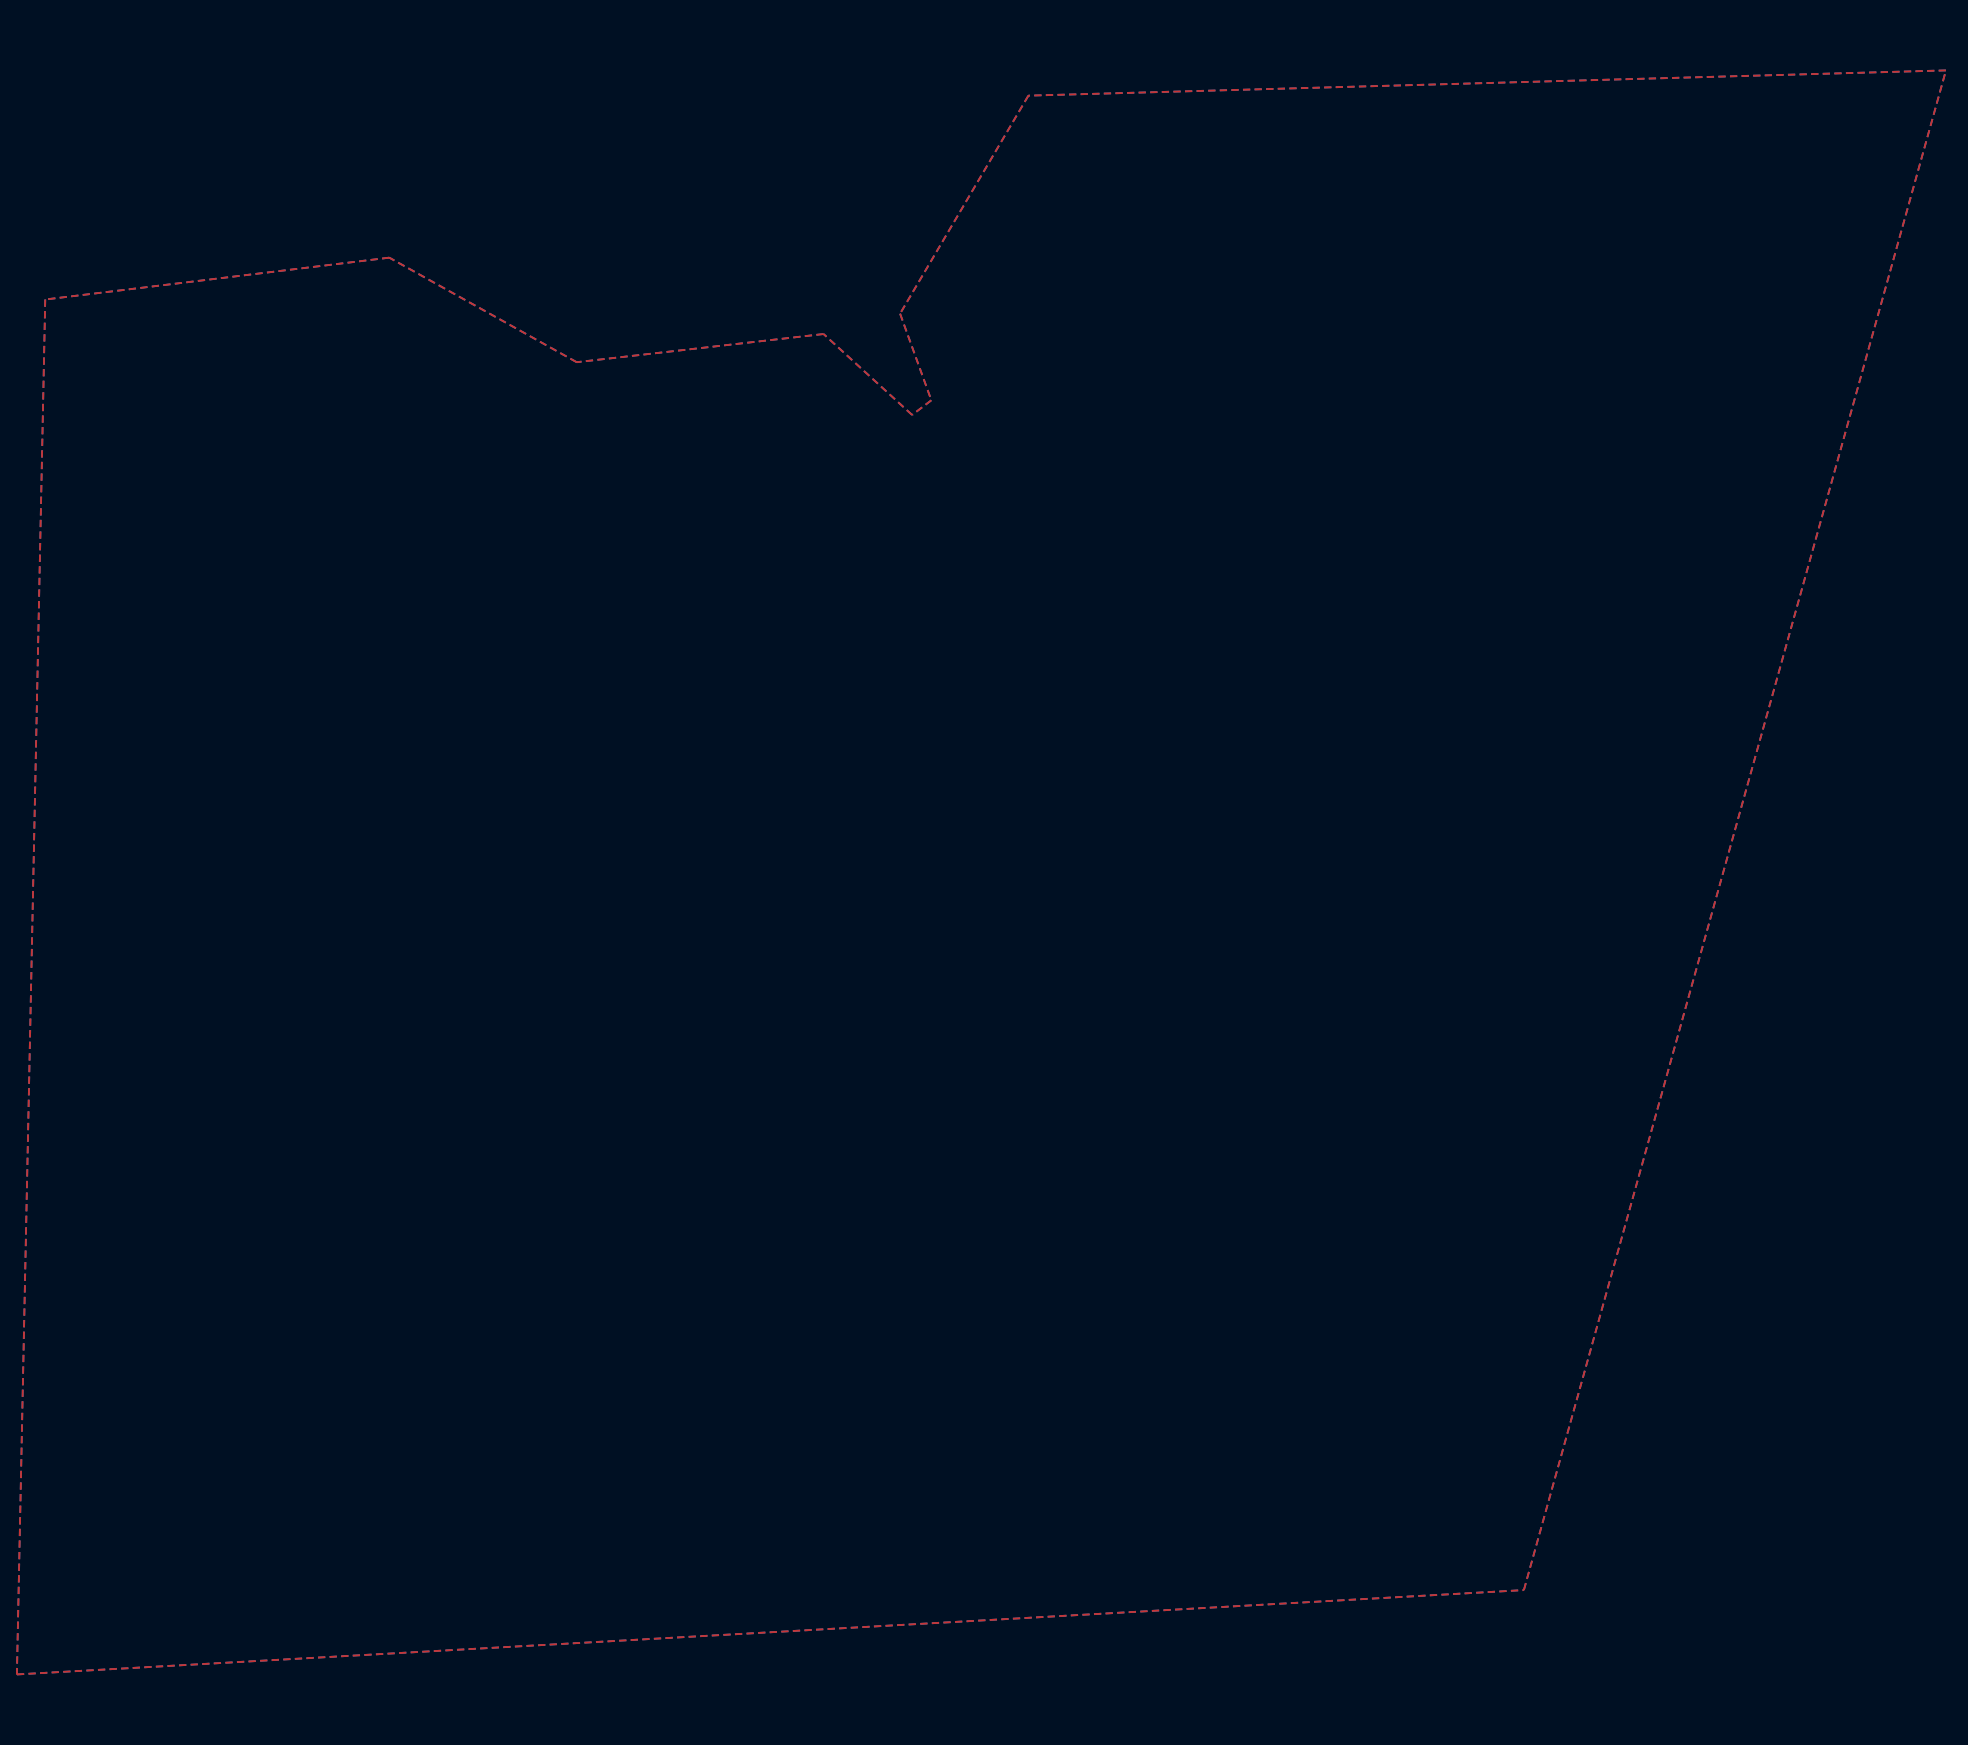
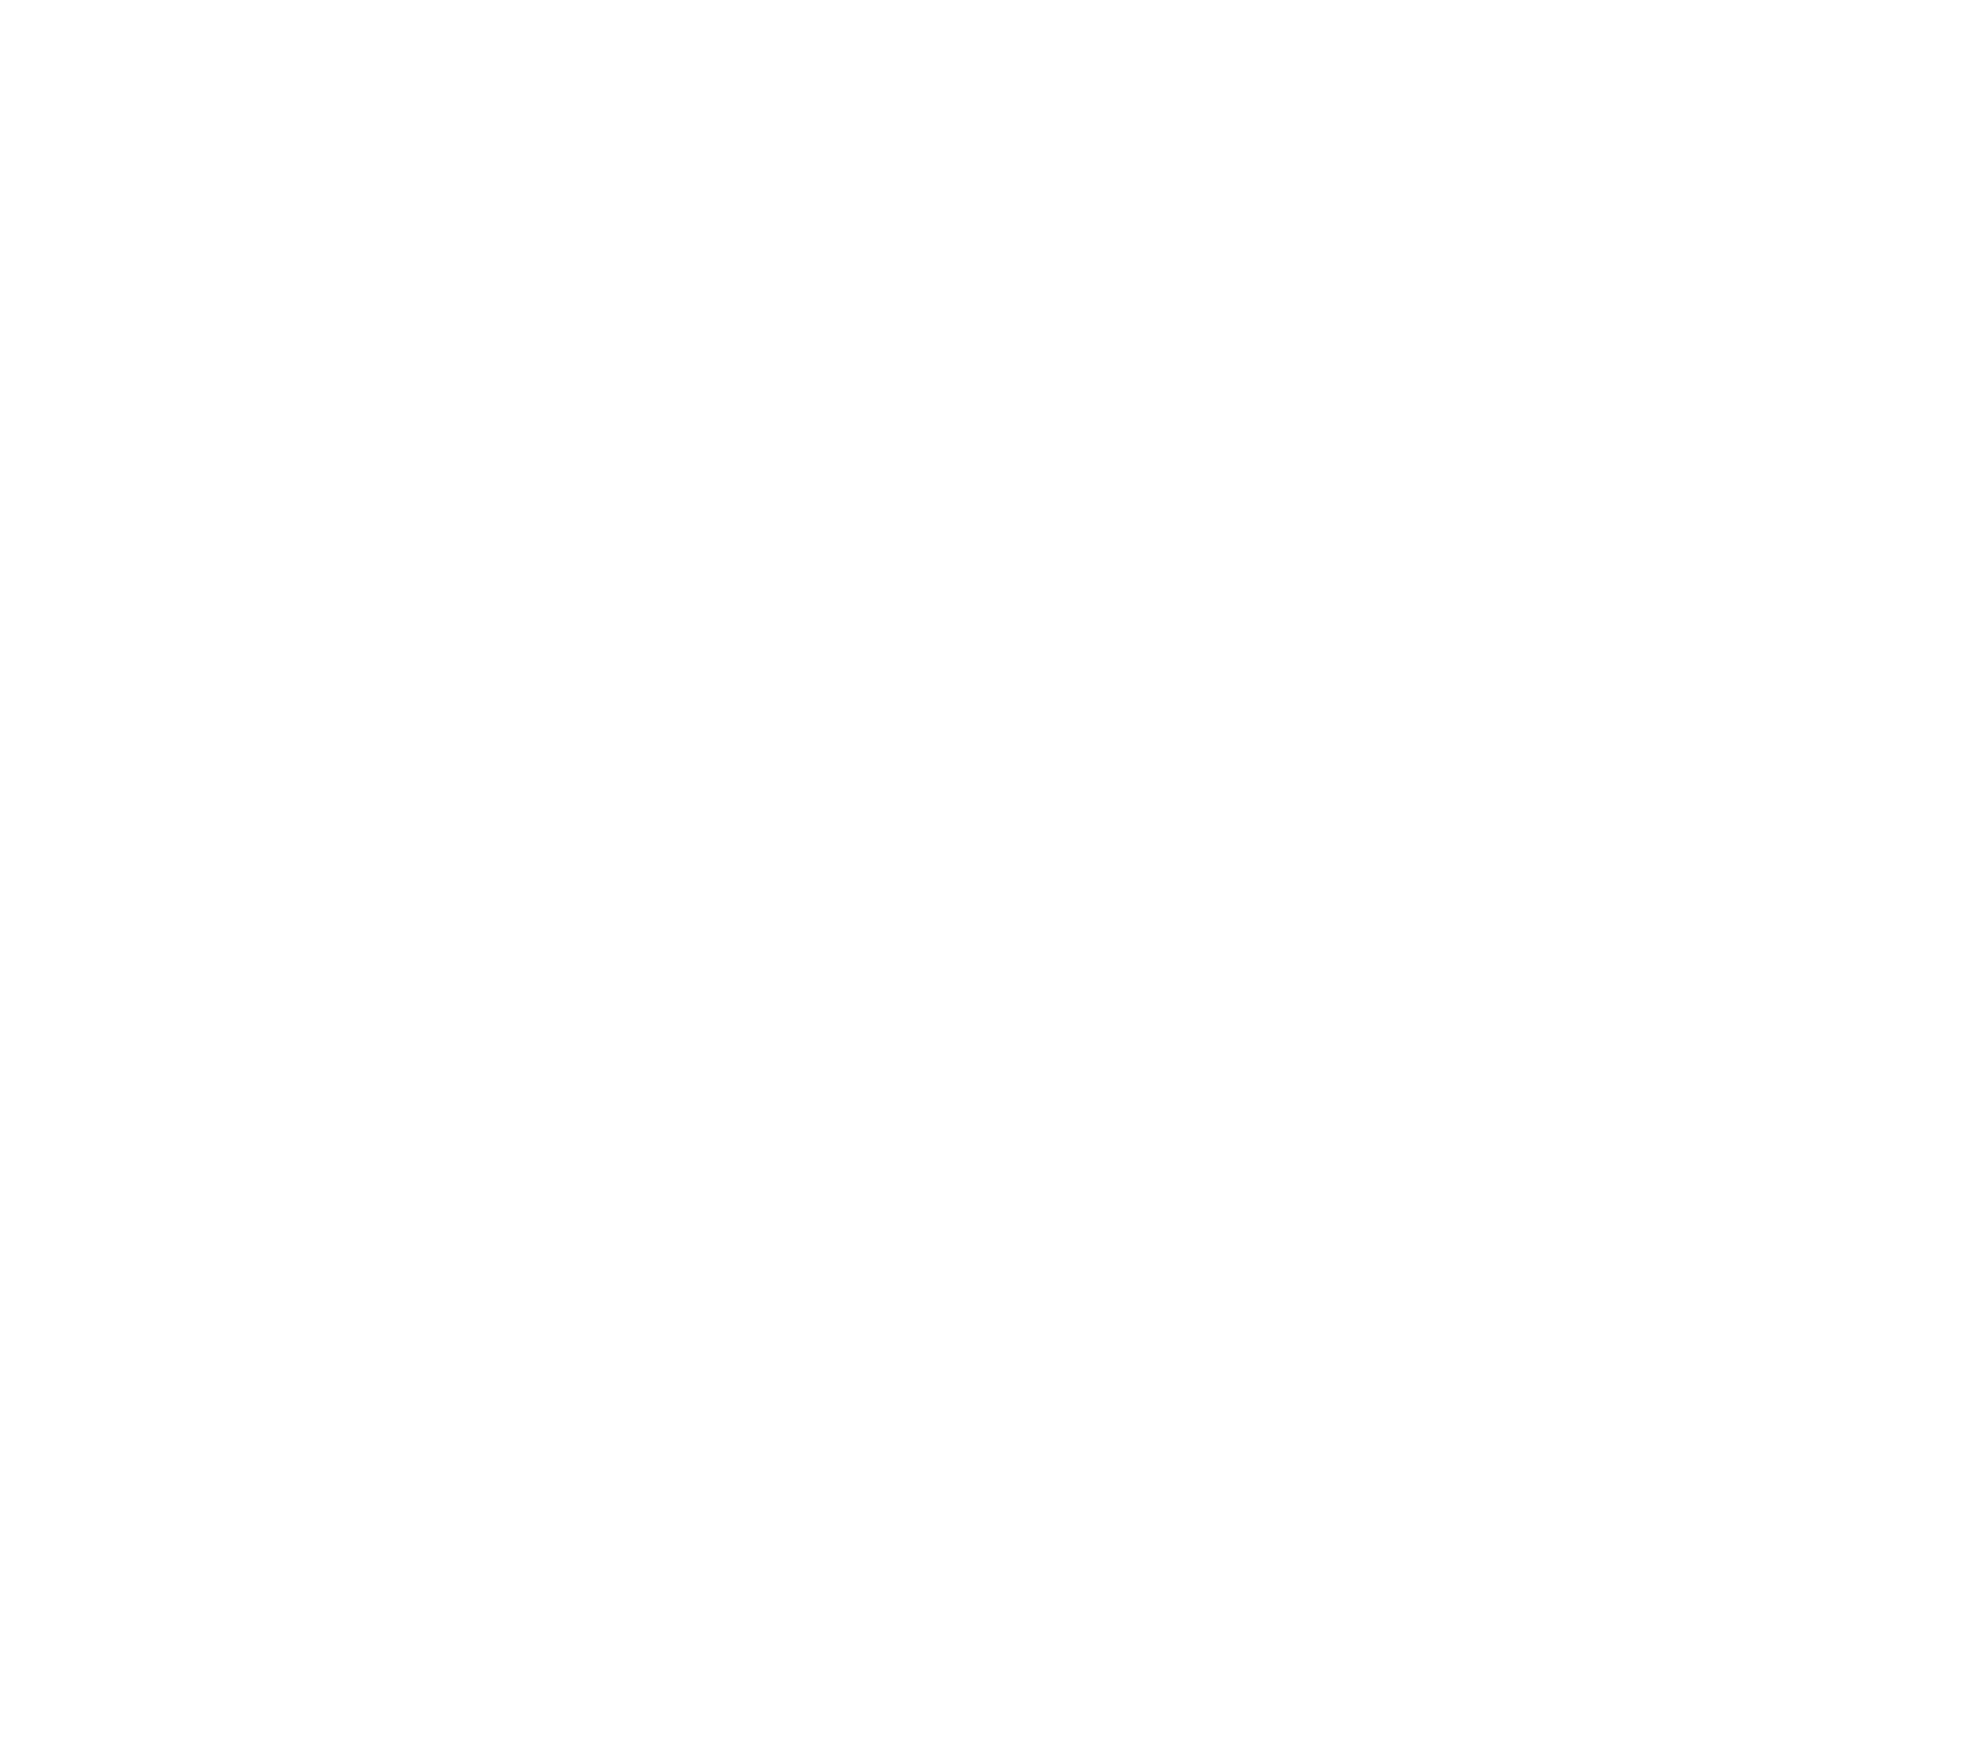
top zone outline: (1945, 70) (1523, 1590) (16, 1674) (45, 299) (389, 257) (576, 362) (823, 334) (912, 414) (931, 400) (900, 313) (1028, 95) (1945, 70) -> none

